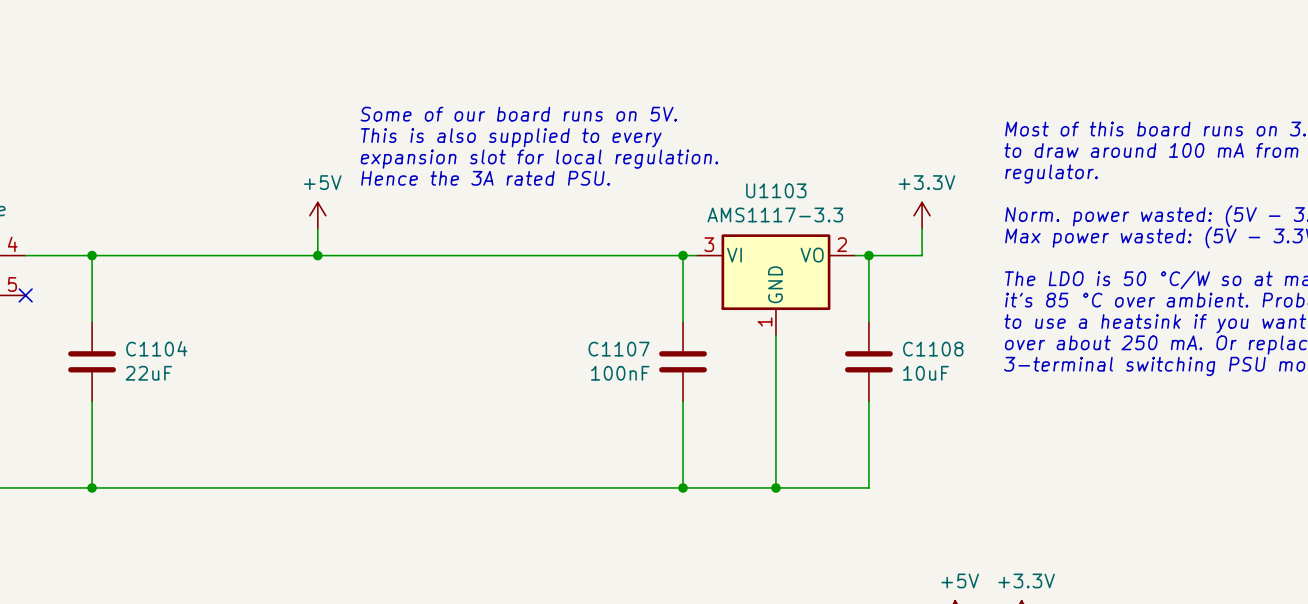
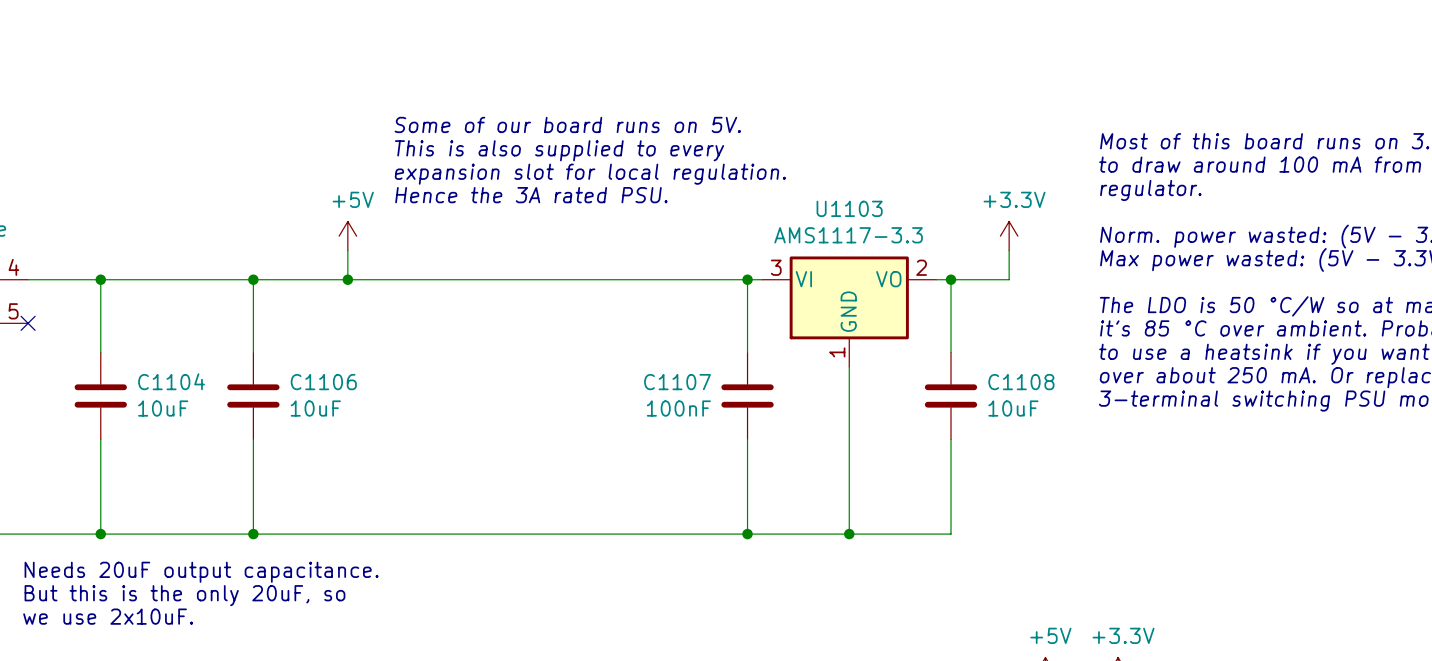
wire: none -> (253, 279) (253, 352)
junction: none -> (253, 279)
C1106: none -> 10uF (253, 395)
C1104 value: 22uF (148, 373) -> 10uF (163, 408)
wire: none -> (253, 439) (253, 534)
junction: none -> (253, 534)
text: none -> Needs 20uF output capacitance. (201, 572)
text: none -> But this is the only 20uF, so (184, 595)
text: none -> we use 2x10uF. (108, 616)

